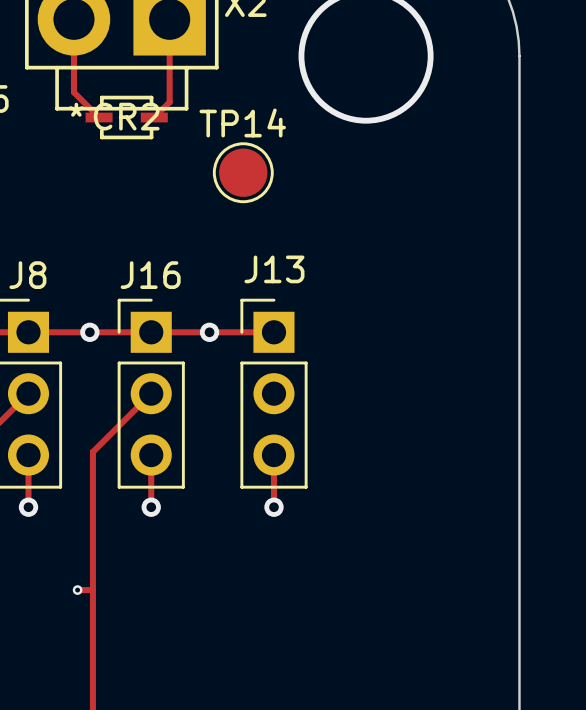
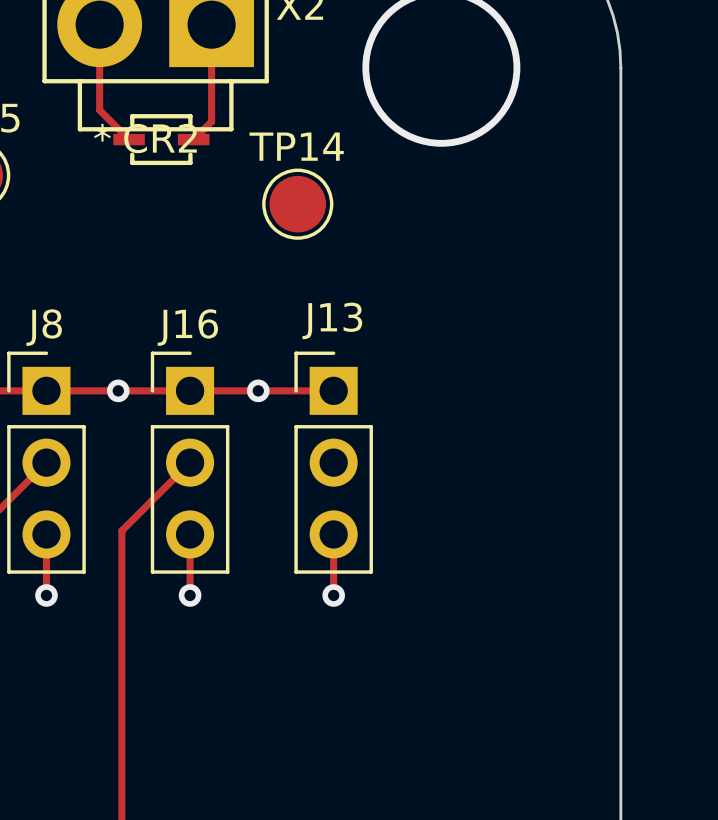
track: (77, 590) (92, 590) -> none
via: (77, 590) -> none

